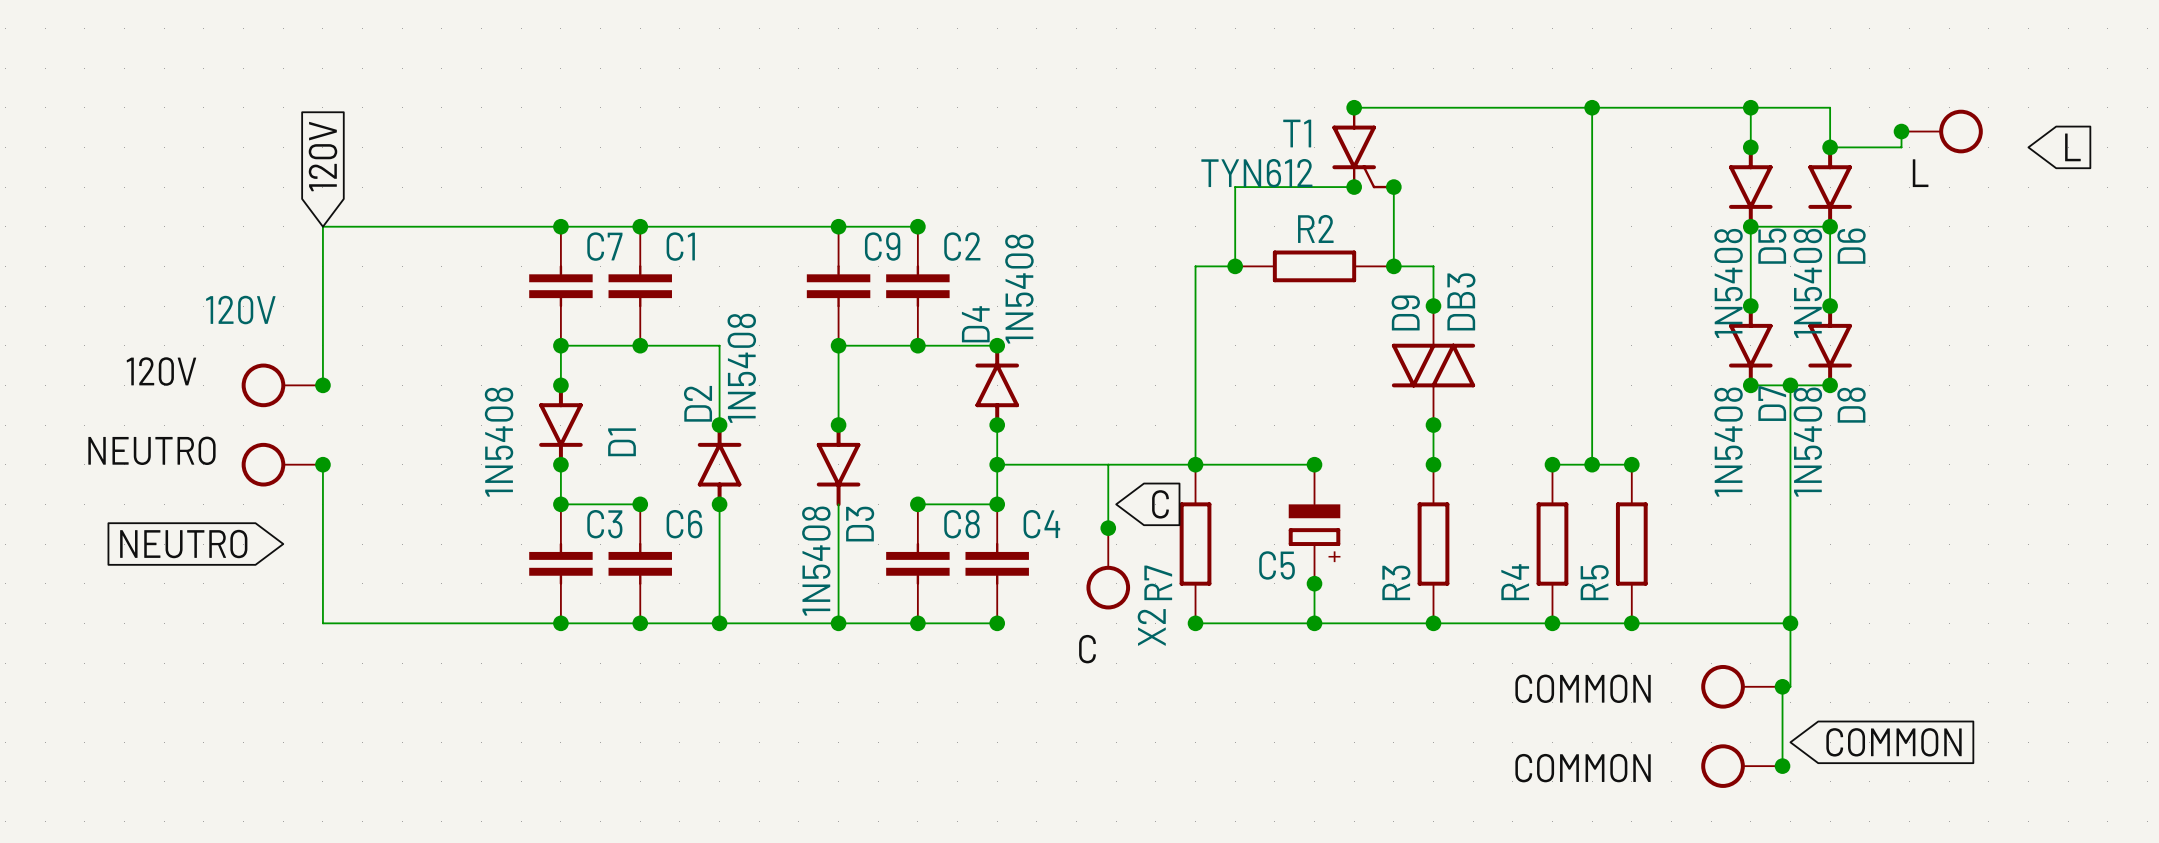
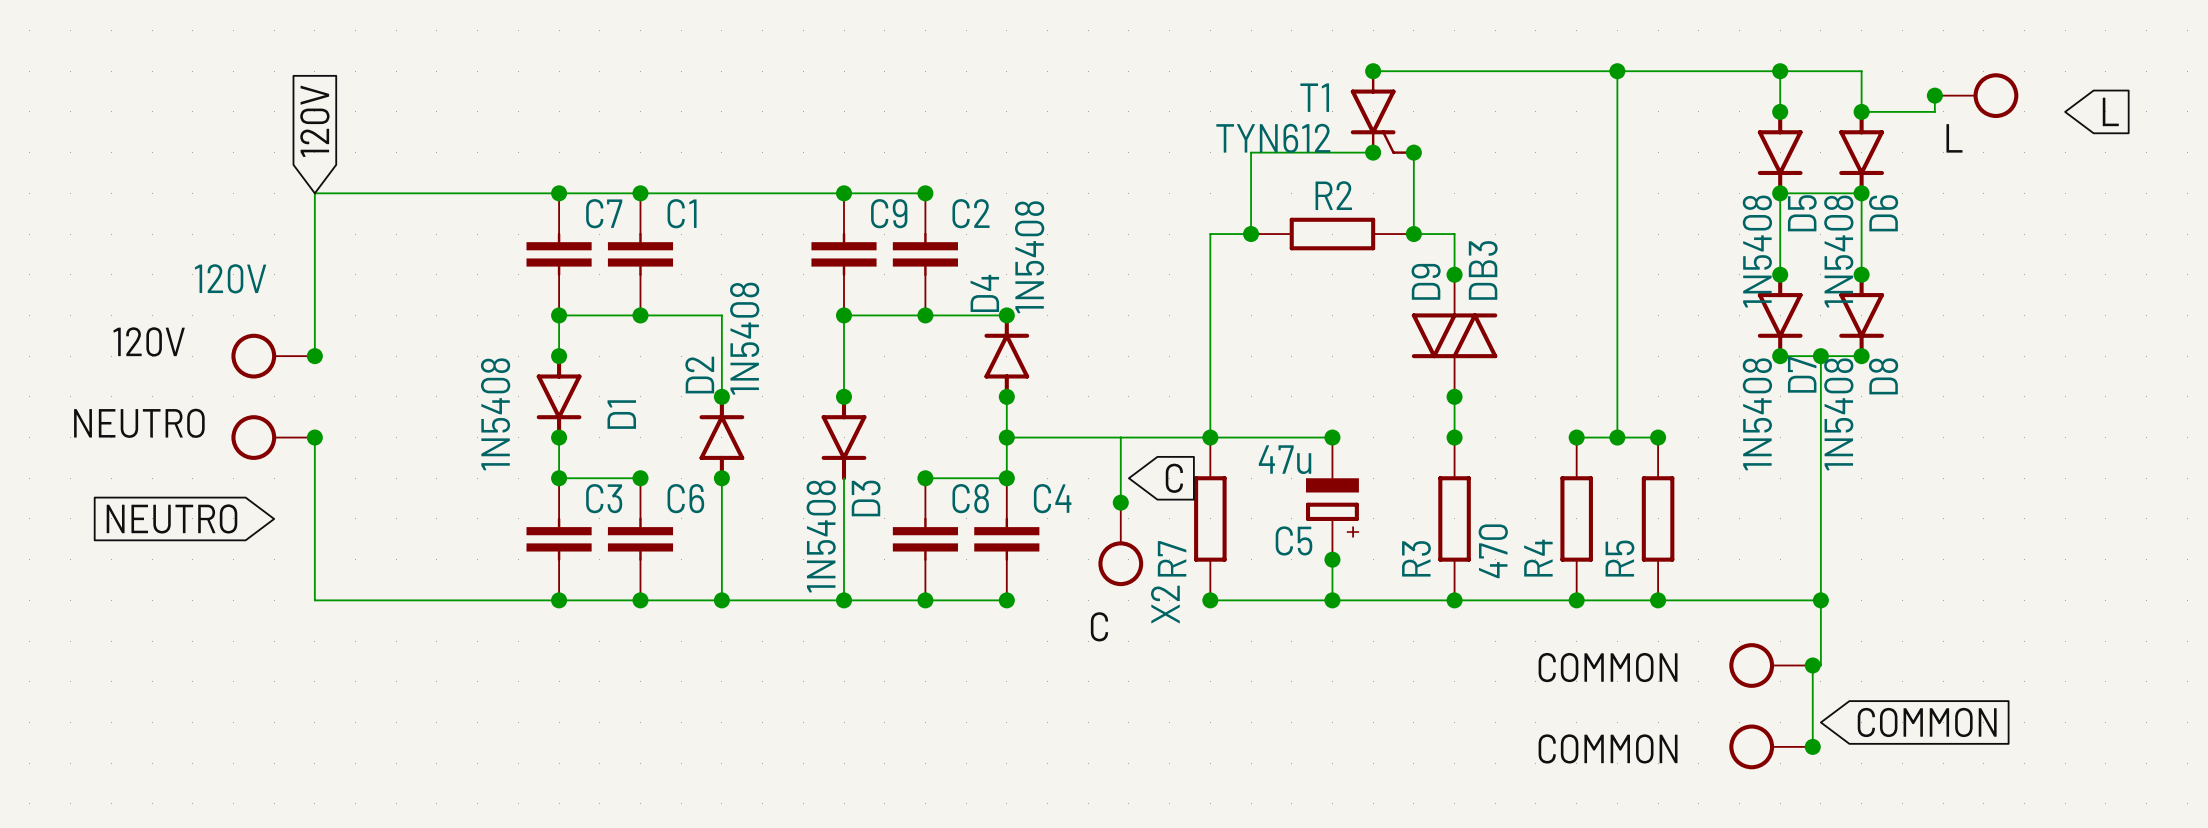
C5 value: none -> 47u (1285, 459)
R3 value: none -> 470 (1493, 551)

